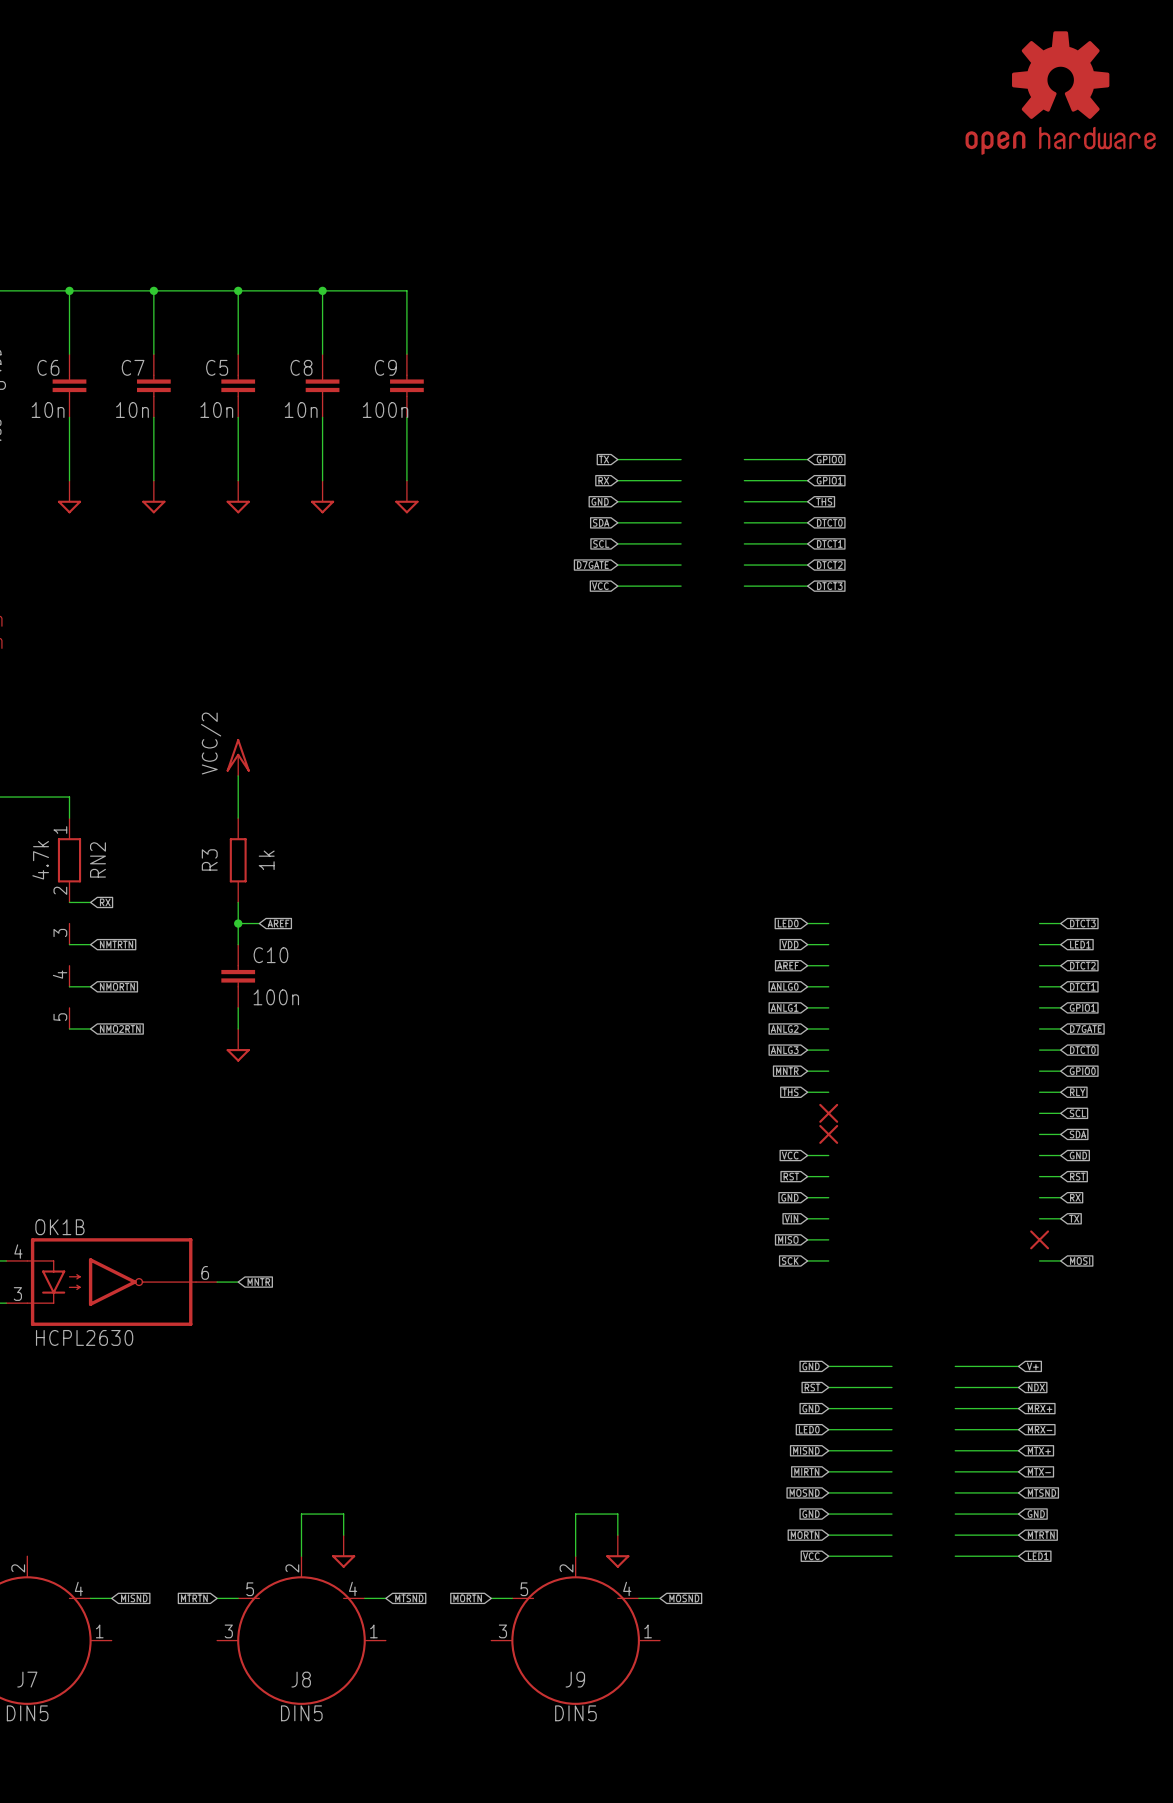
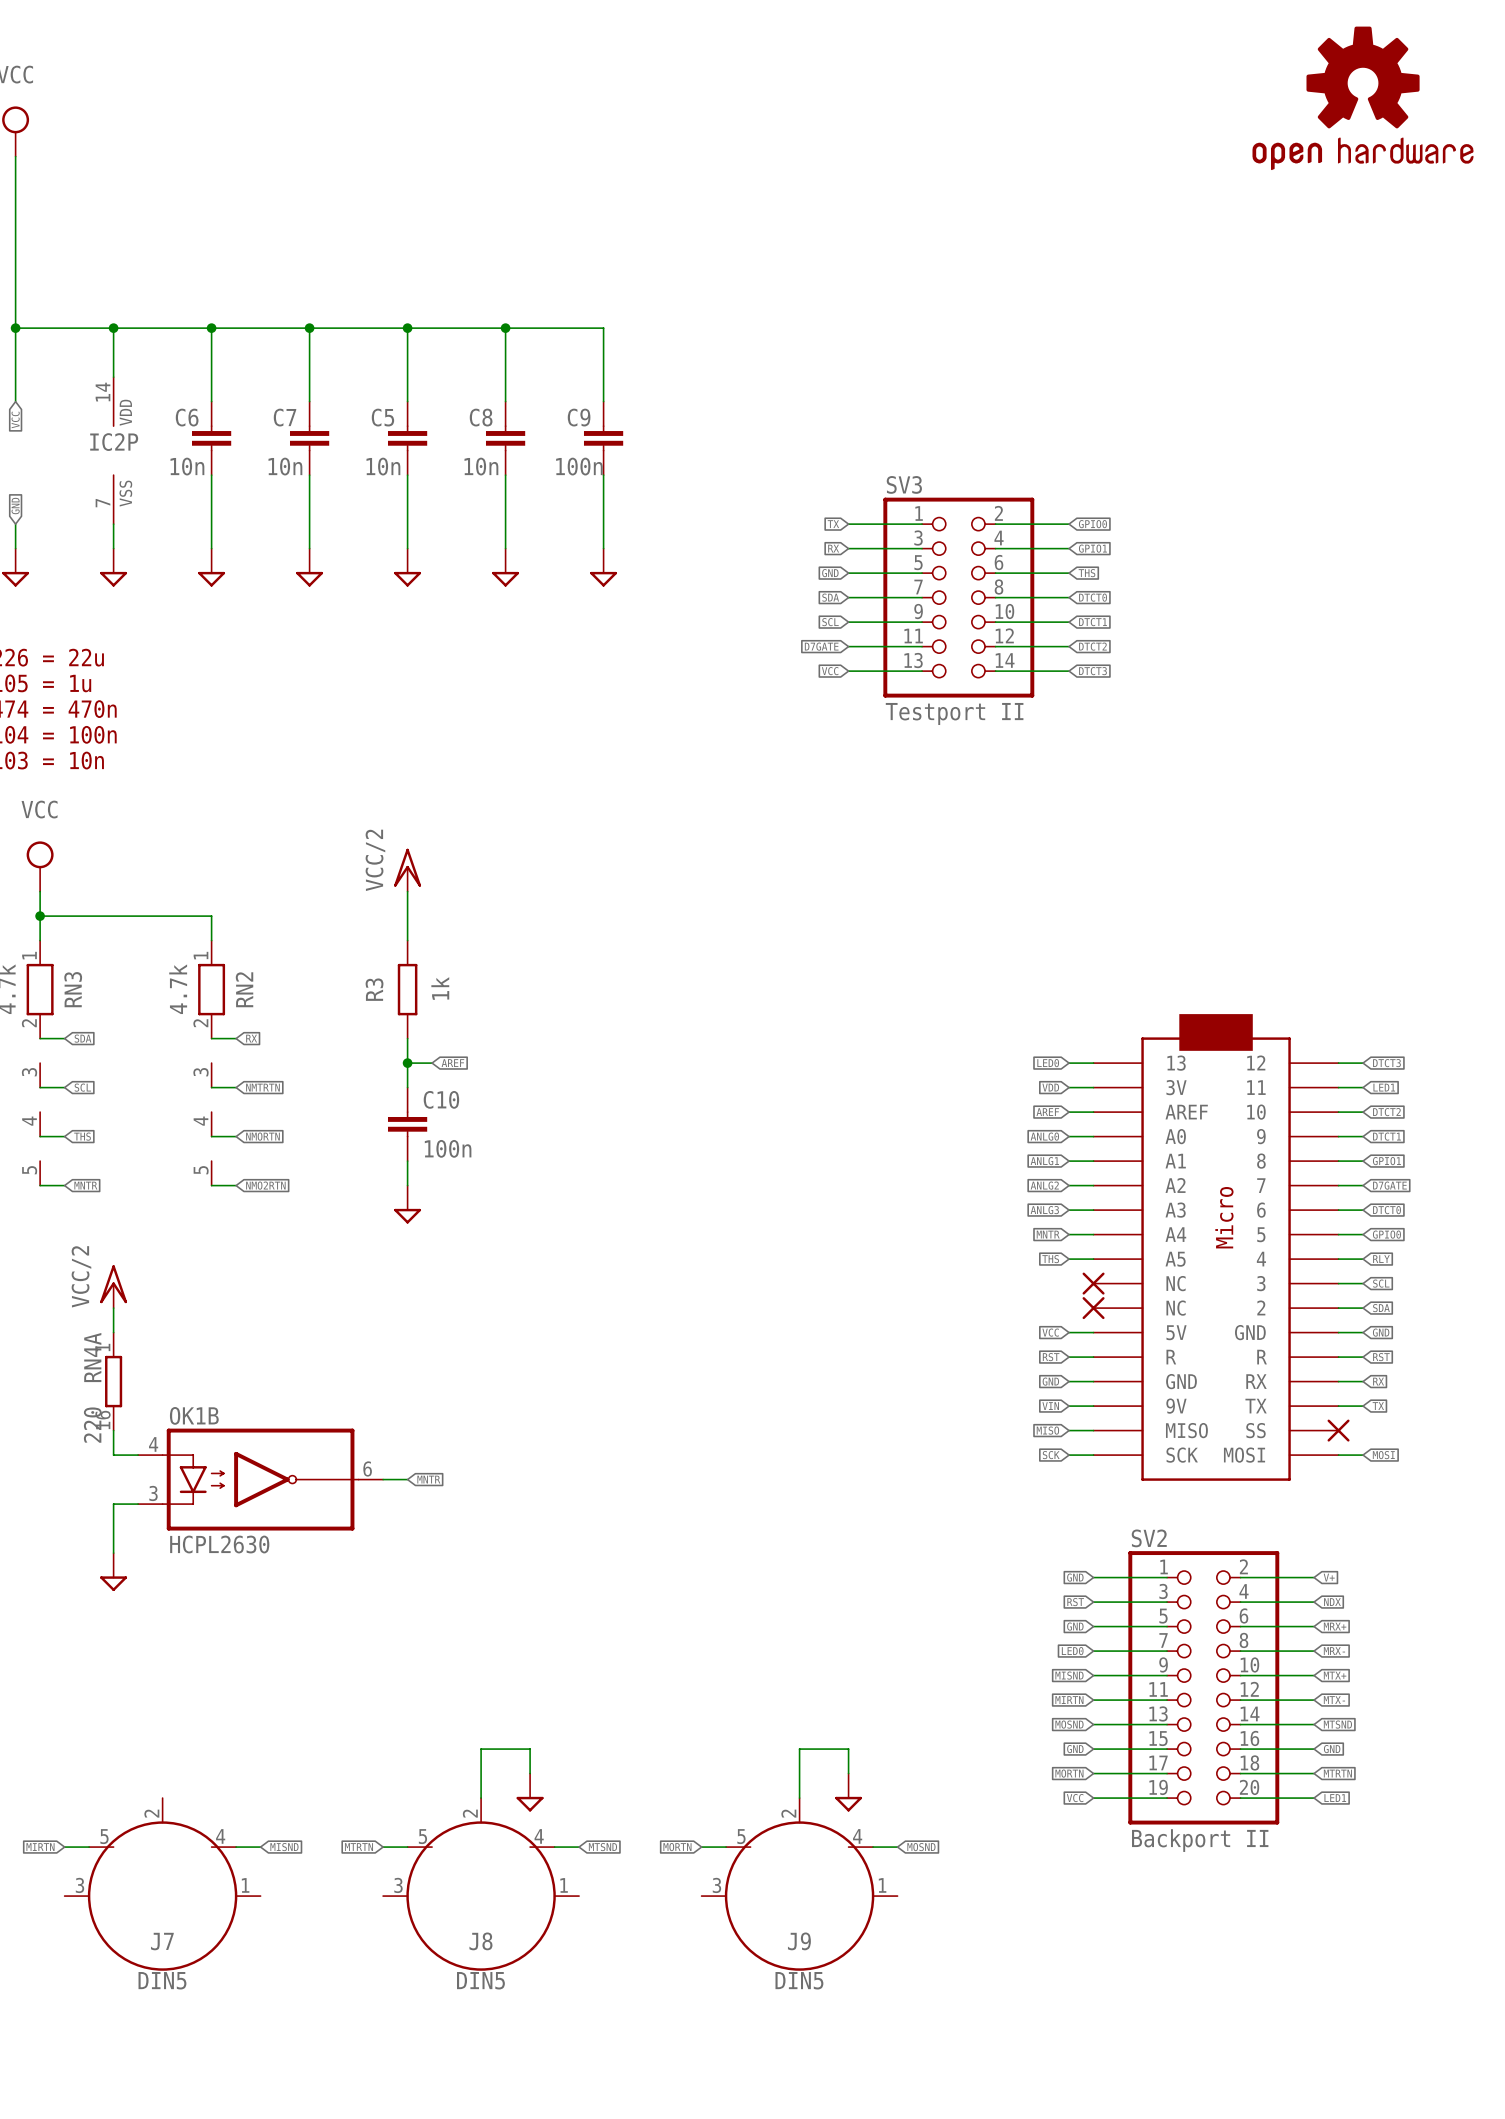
SV3: none -> Testport II (958, 597)
part: none -> (1216, 1247)
SV2: none -> Backport II (1203, 1687)

